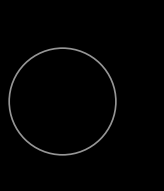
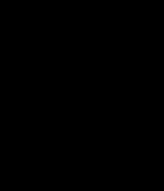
drawing: [8, 47, 117, 156] -> none

